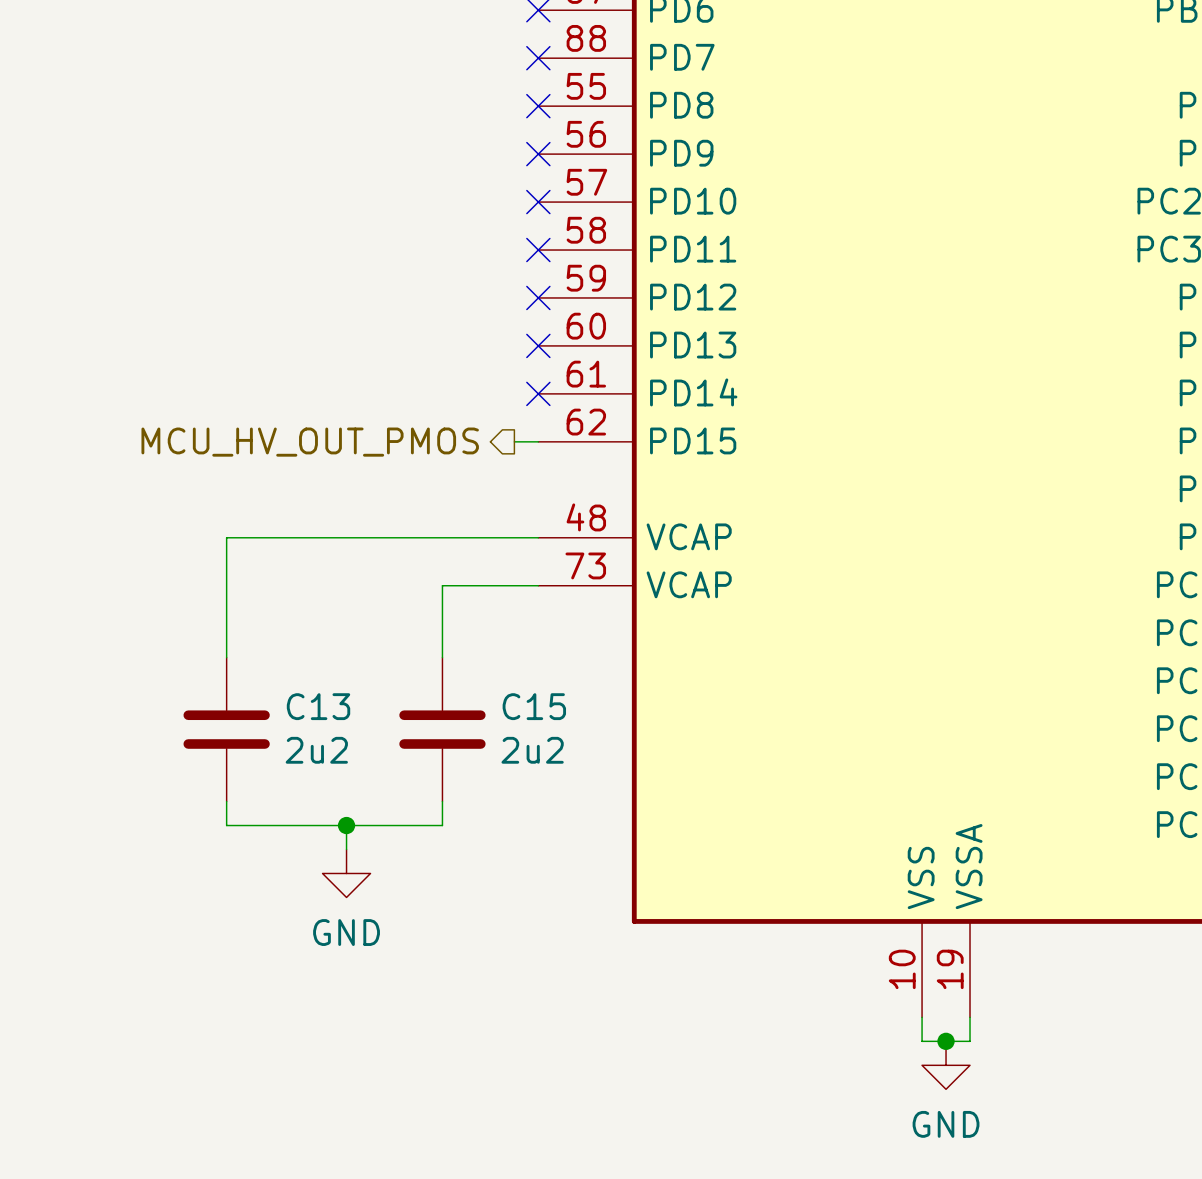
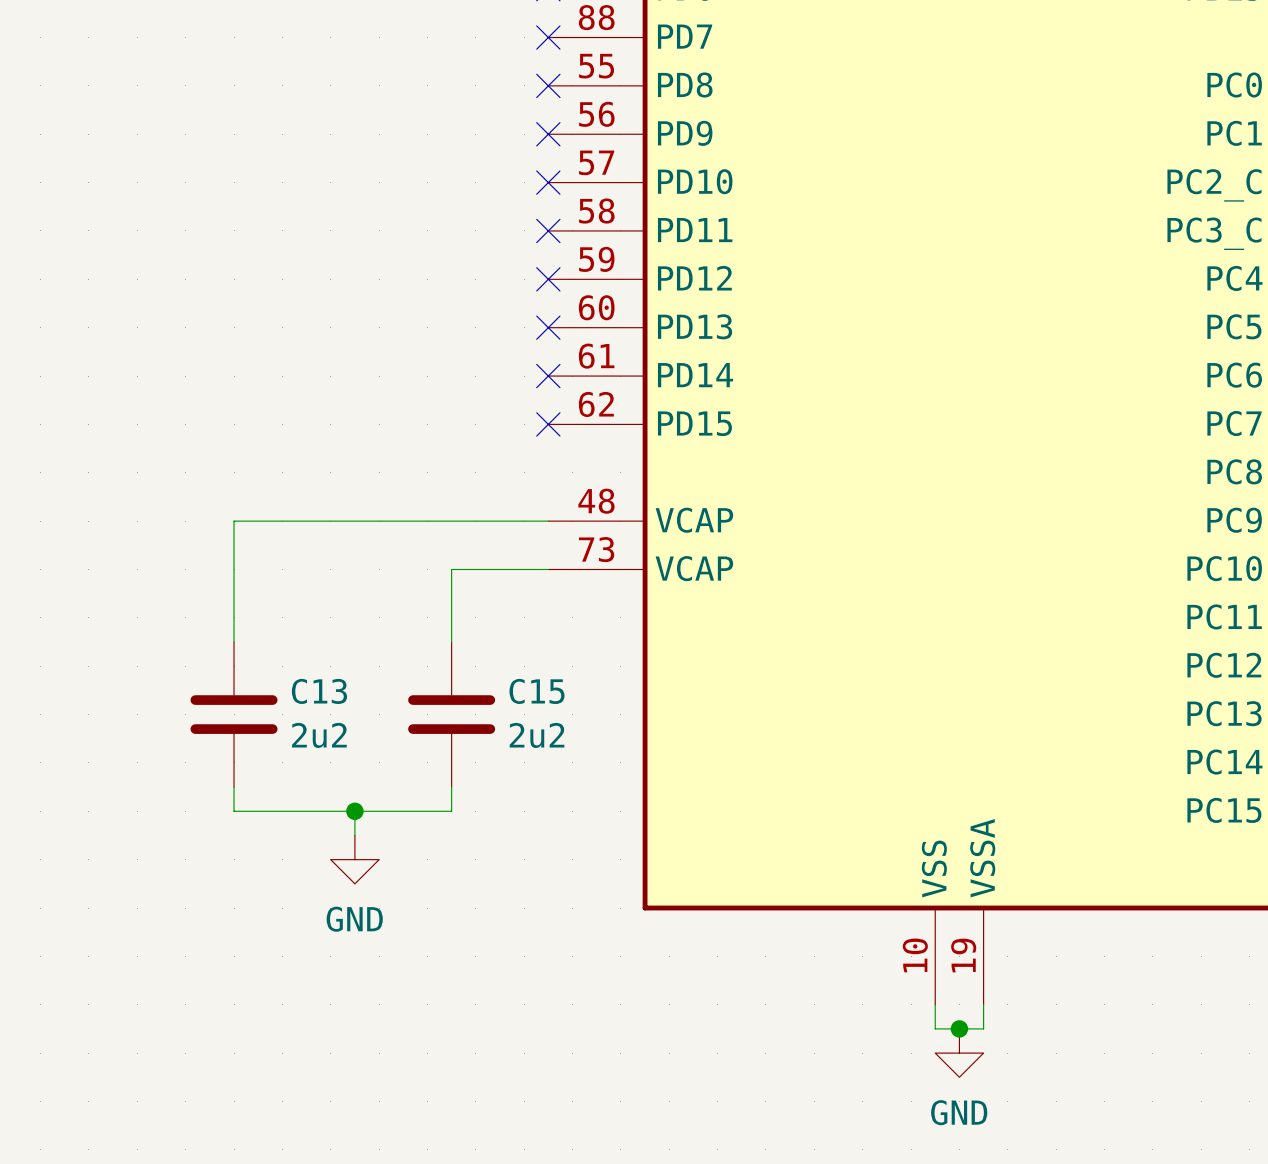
wire: (514, 441) (538, 441) -> none
no-connect mark: none -> (548, 424)
hierarchical label: MCU_HV_OUT_PMOS (310, 442) -> none

